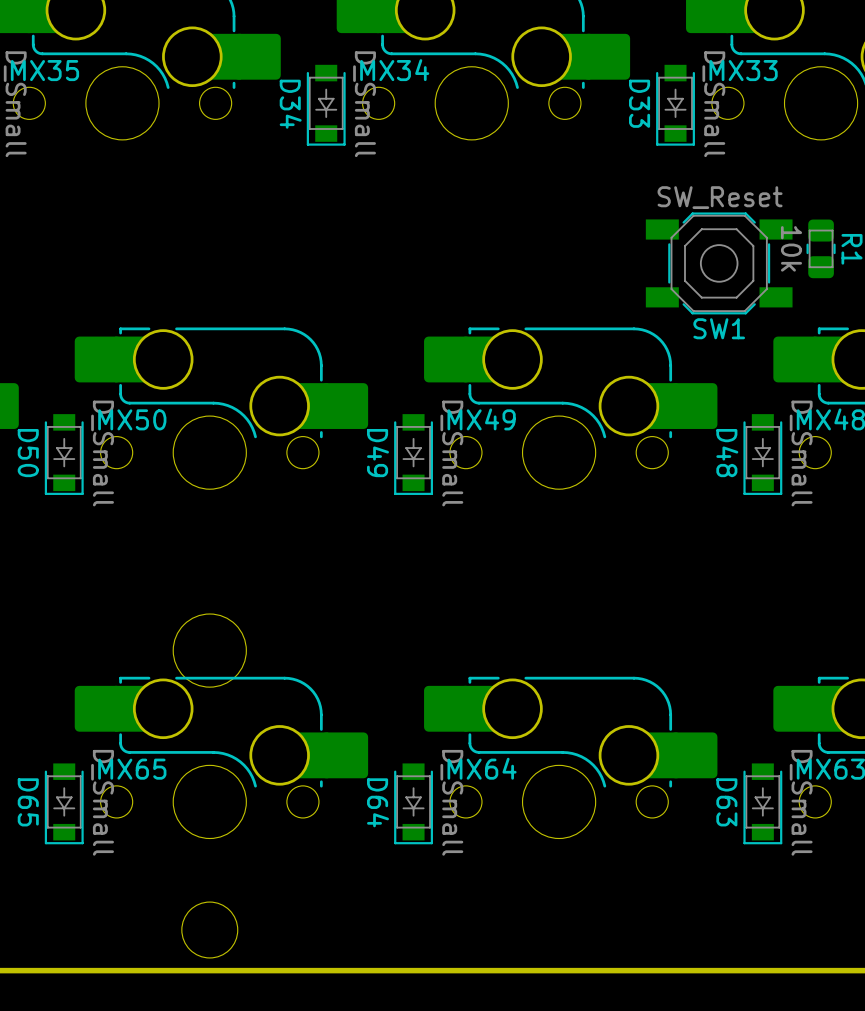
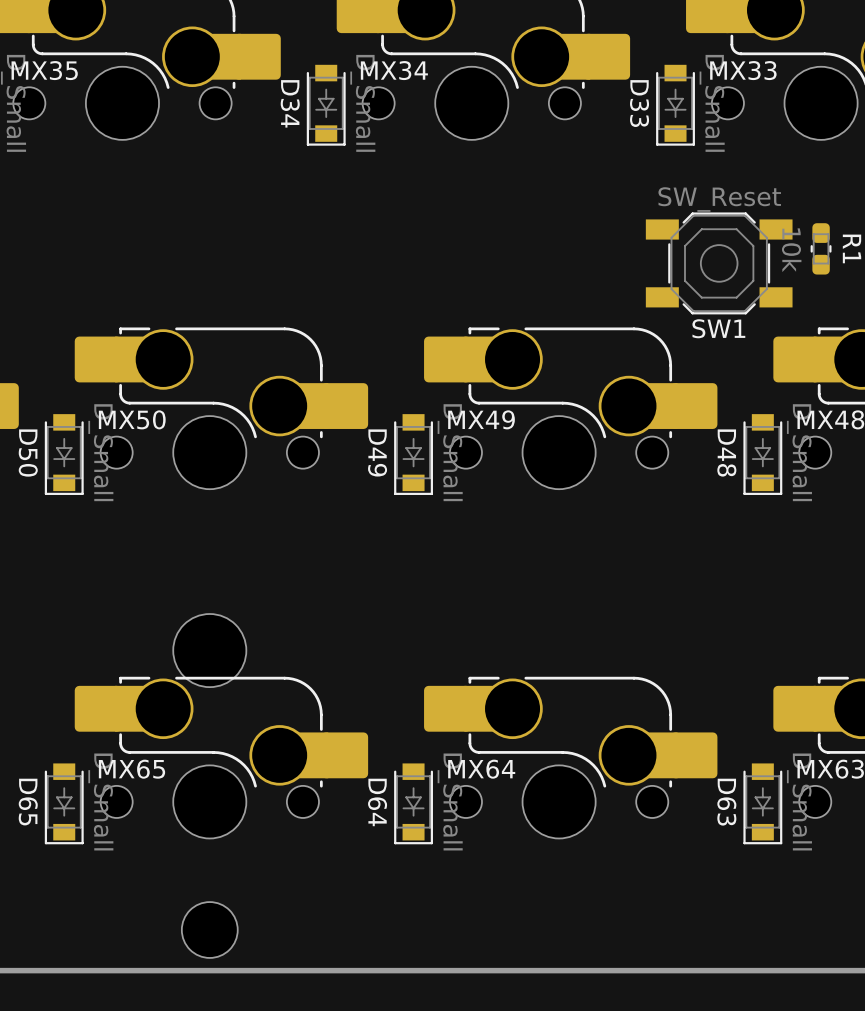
R1 footprint: [806, 219, 836, 279] -> [810, 223, 832, 275]

